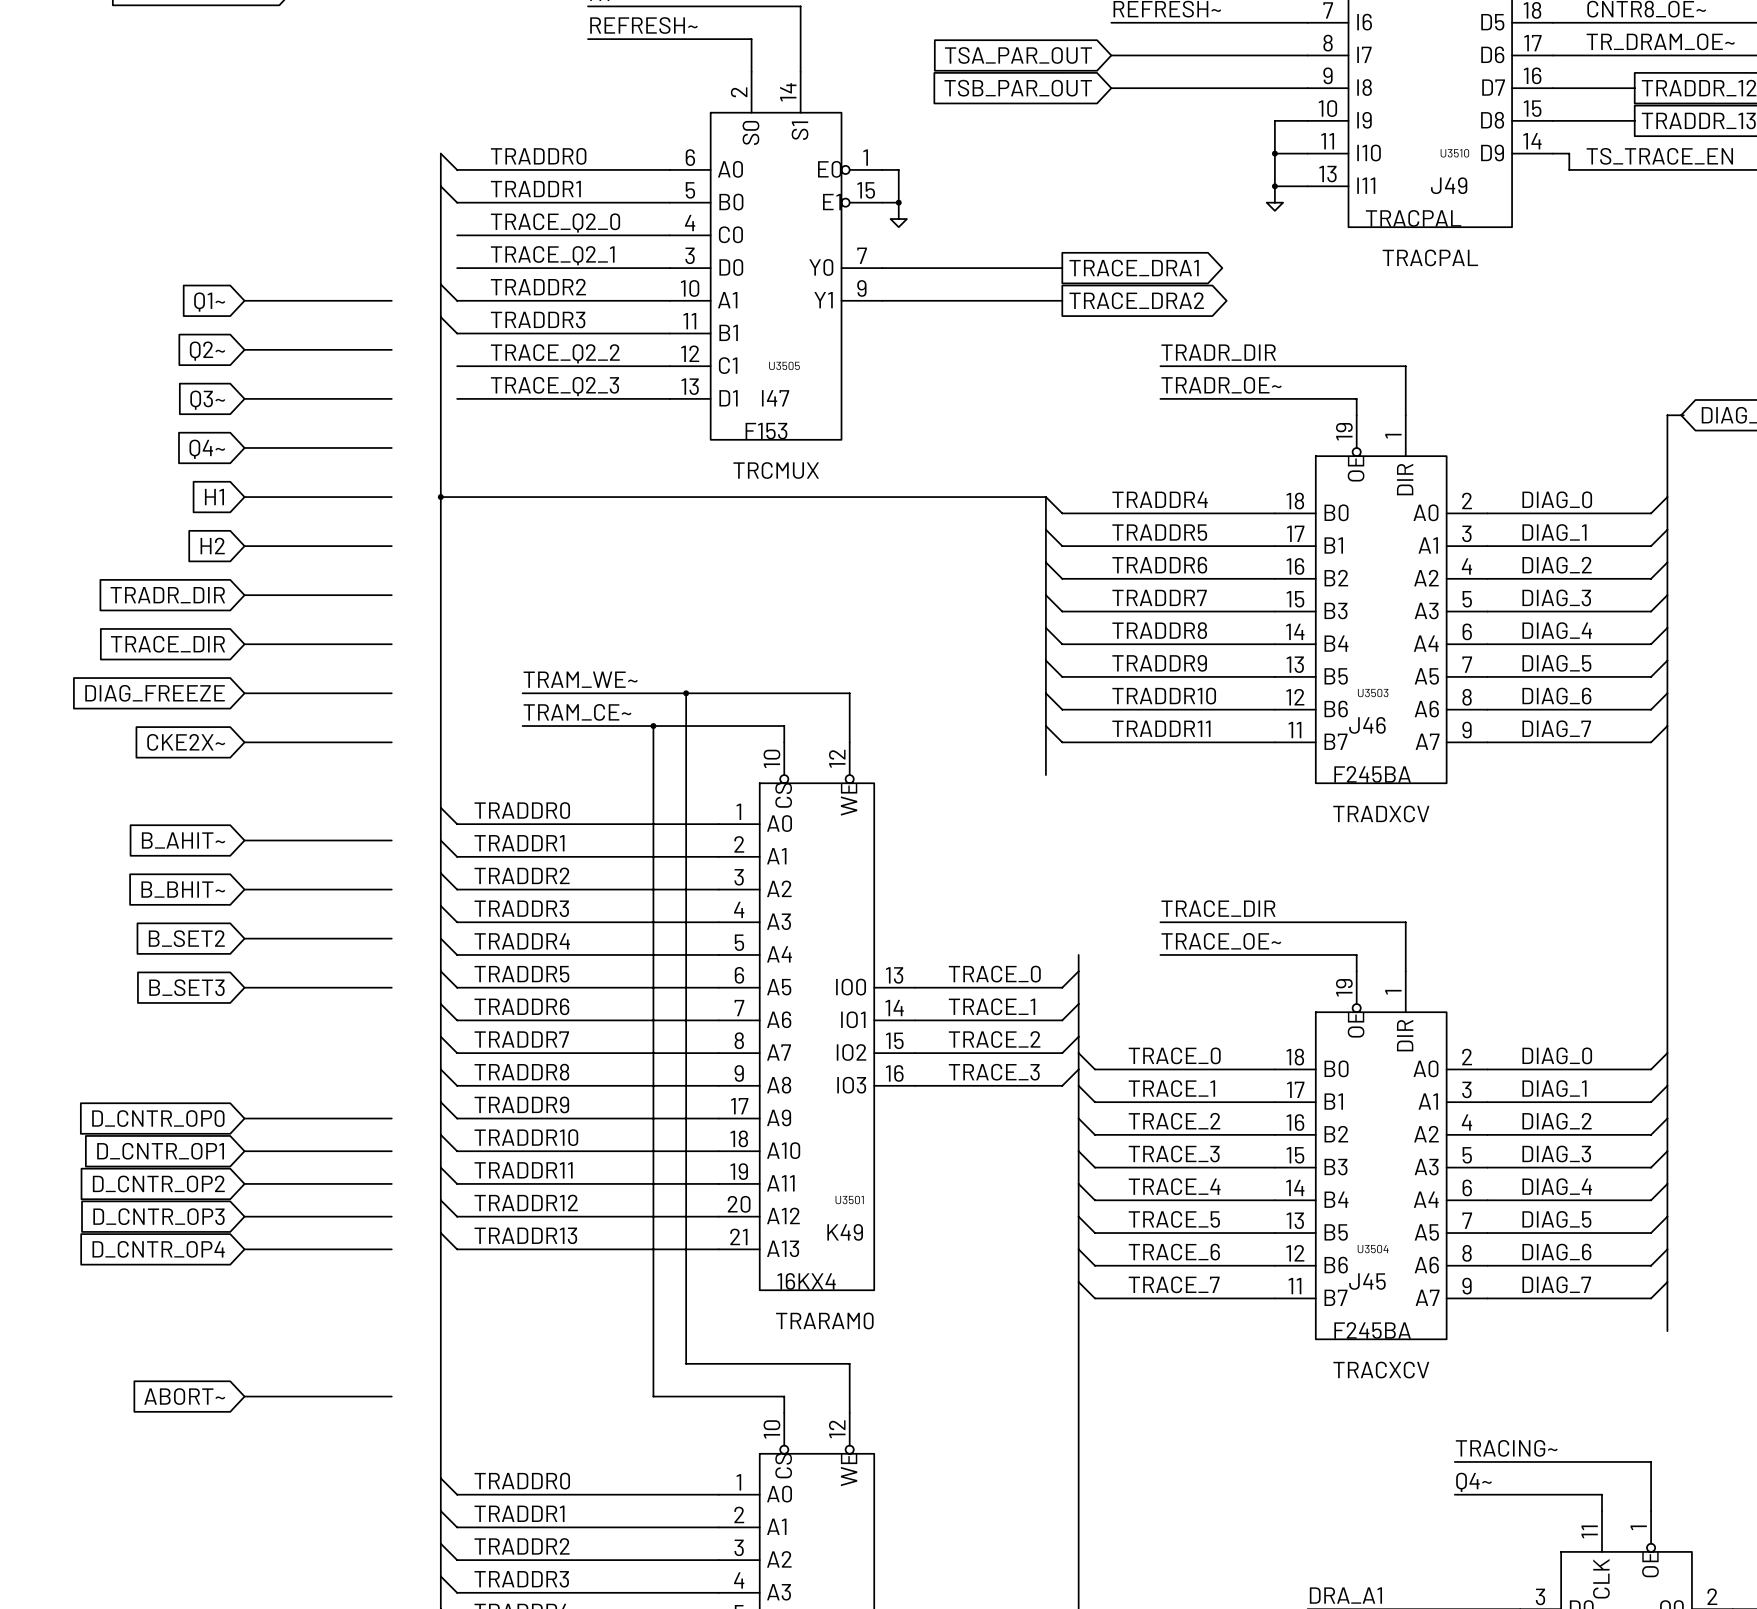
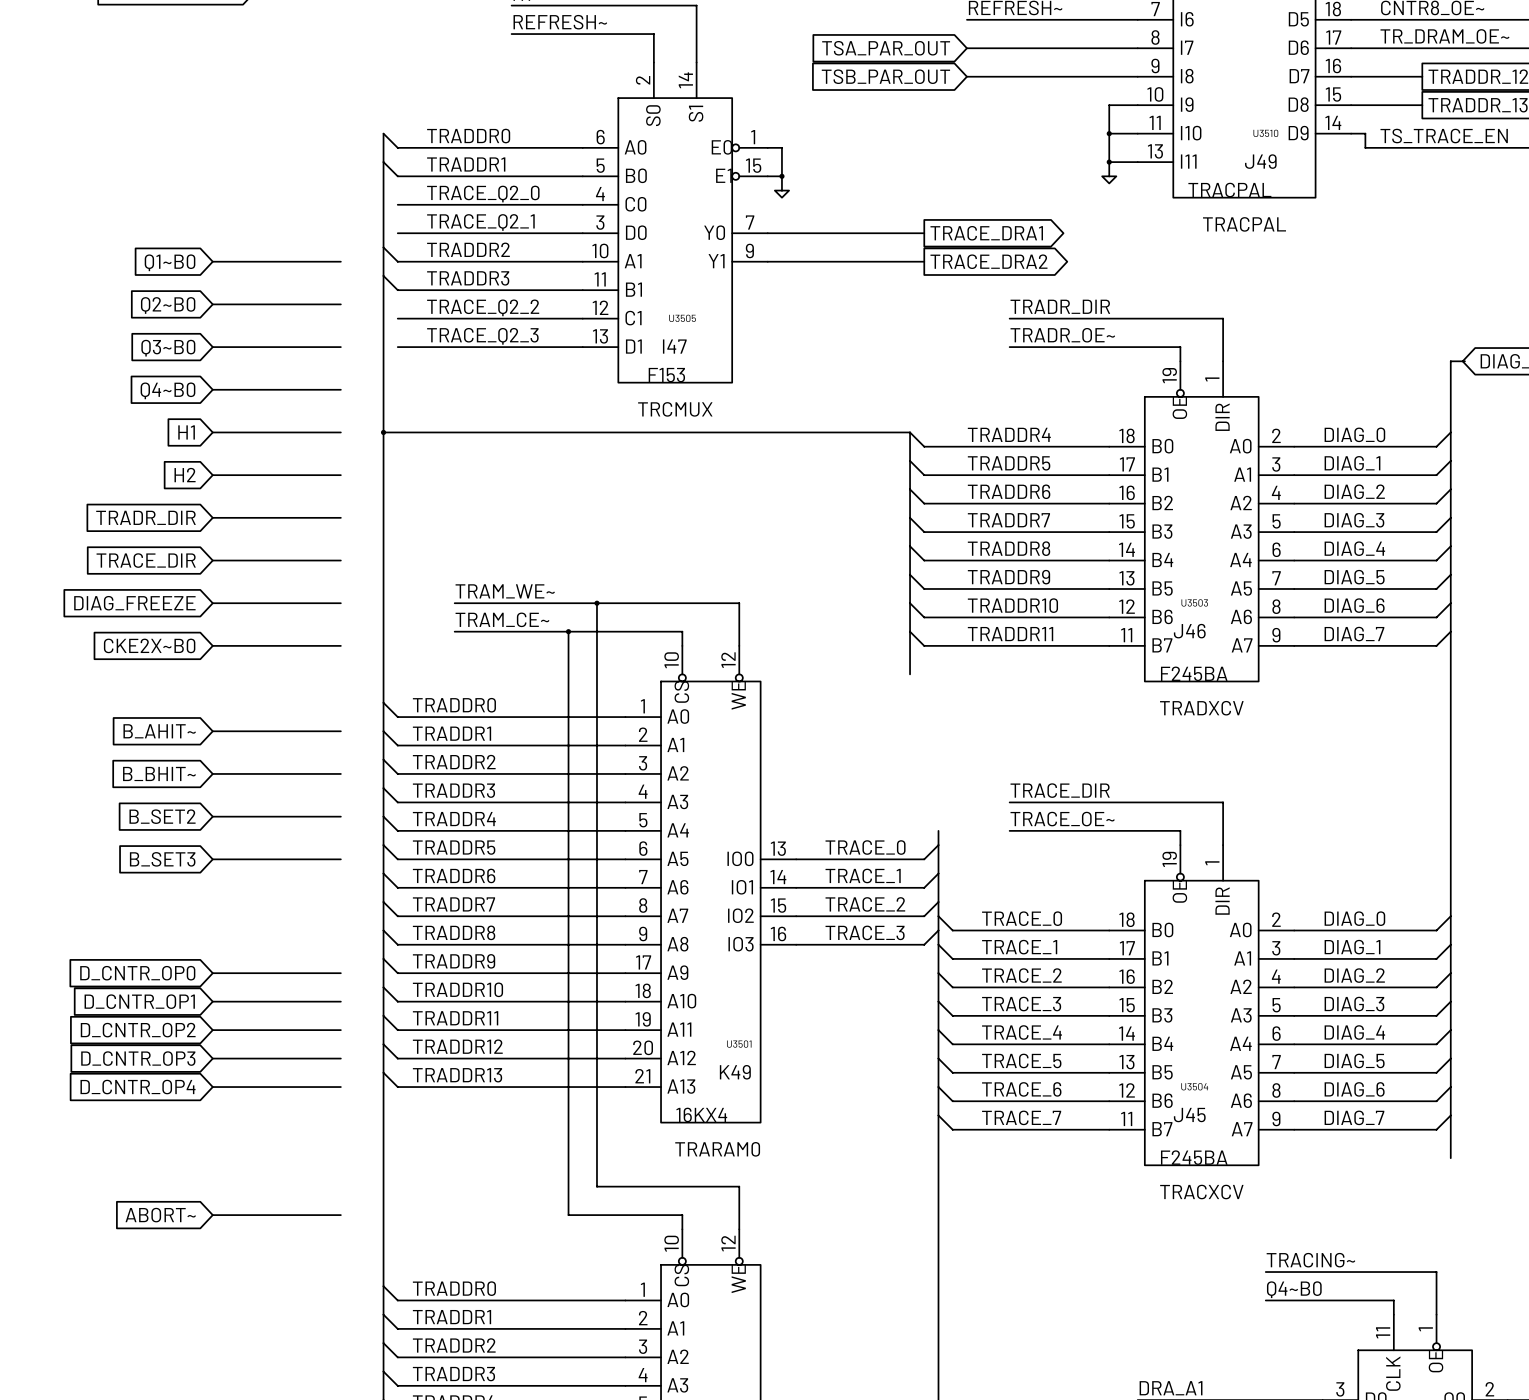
global label: Q1~ (209, 302) -> Q1~B0 (170, 262)
global label: Q2~ (207, 351) -> Q2~B0 (168, 305)
global label: Q3~ (207, 400) -> Q3~B0 (168, 348)
global label: Q4~ (207, 449) -> Q4~B0 (167, 390)
global label: CKE2X~ (186, 742) -> CKE2X~B0 (149, 645)
label: Q4~ (1474, 1482) -> Q4~B0 (1294, 1289)

